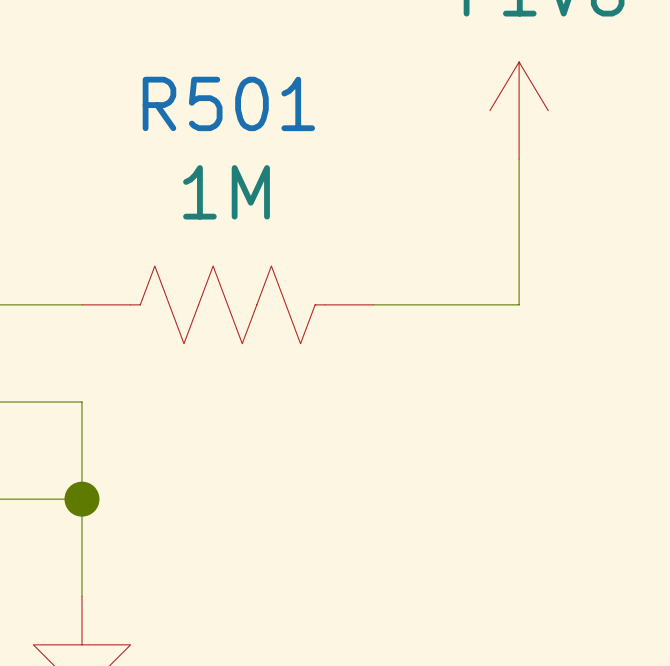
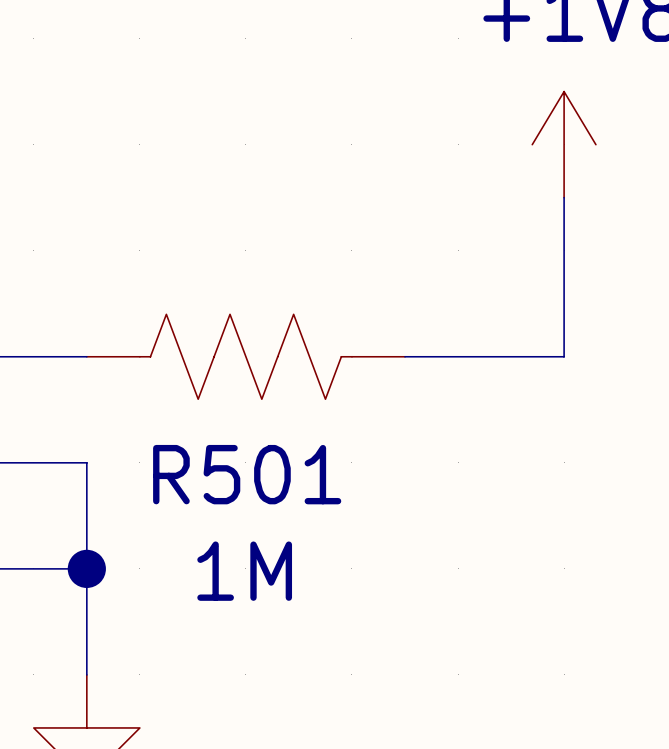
R501 name position: R501 (228, 103) -> R501 (247, 474)
R501 value position: 1M (226, 192) -> 1M (244, 571)

